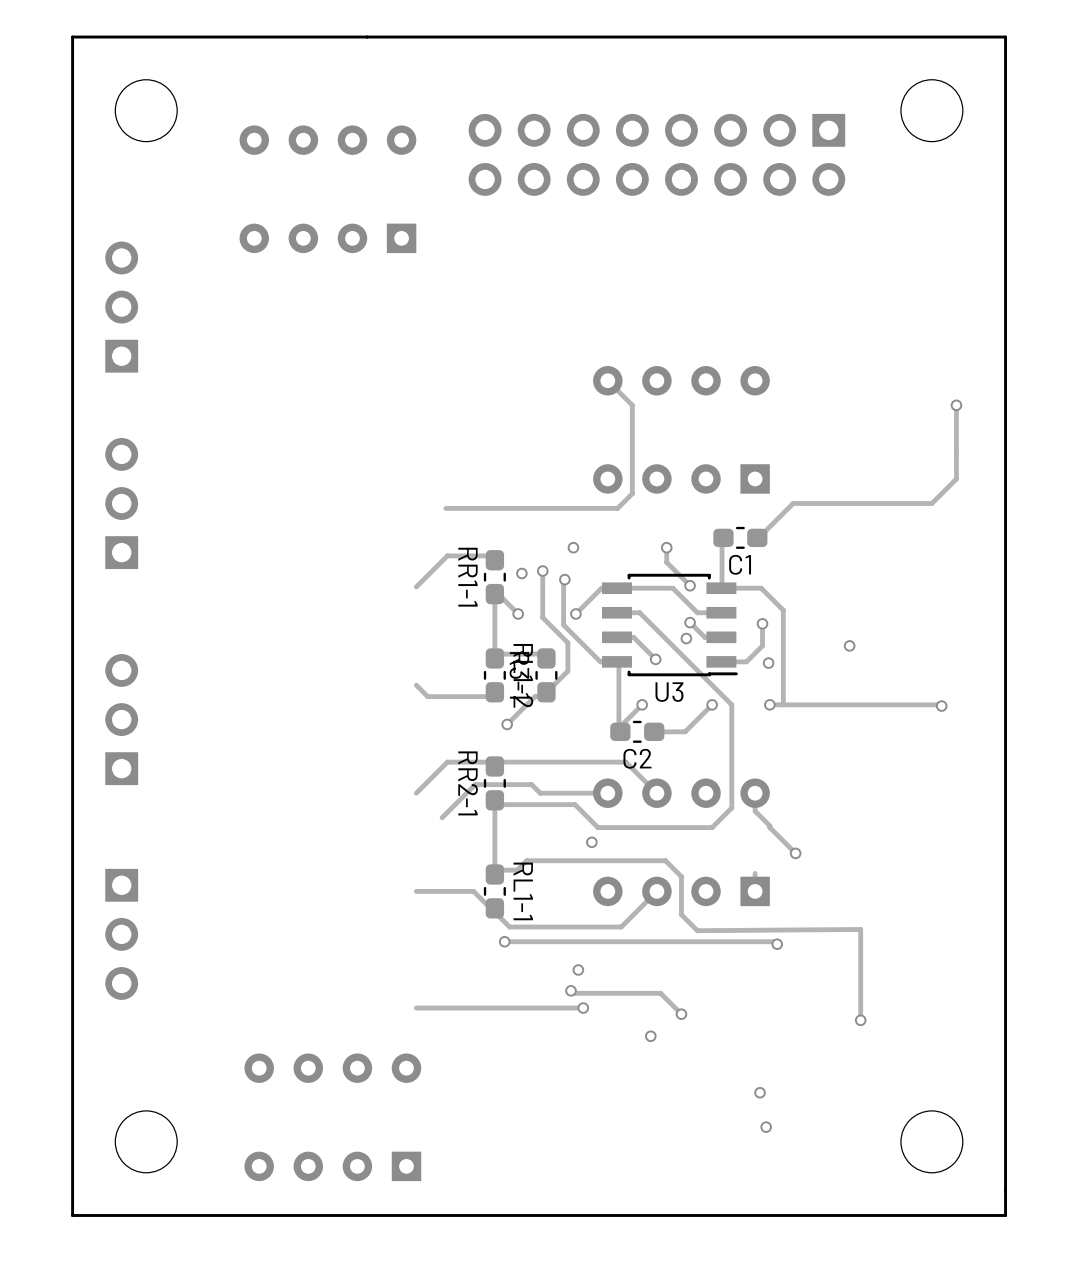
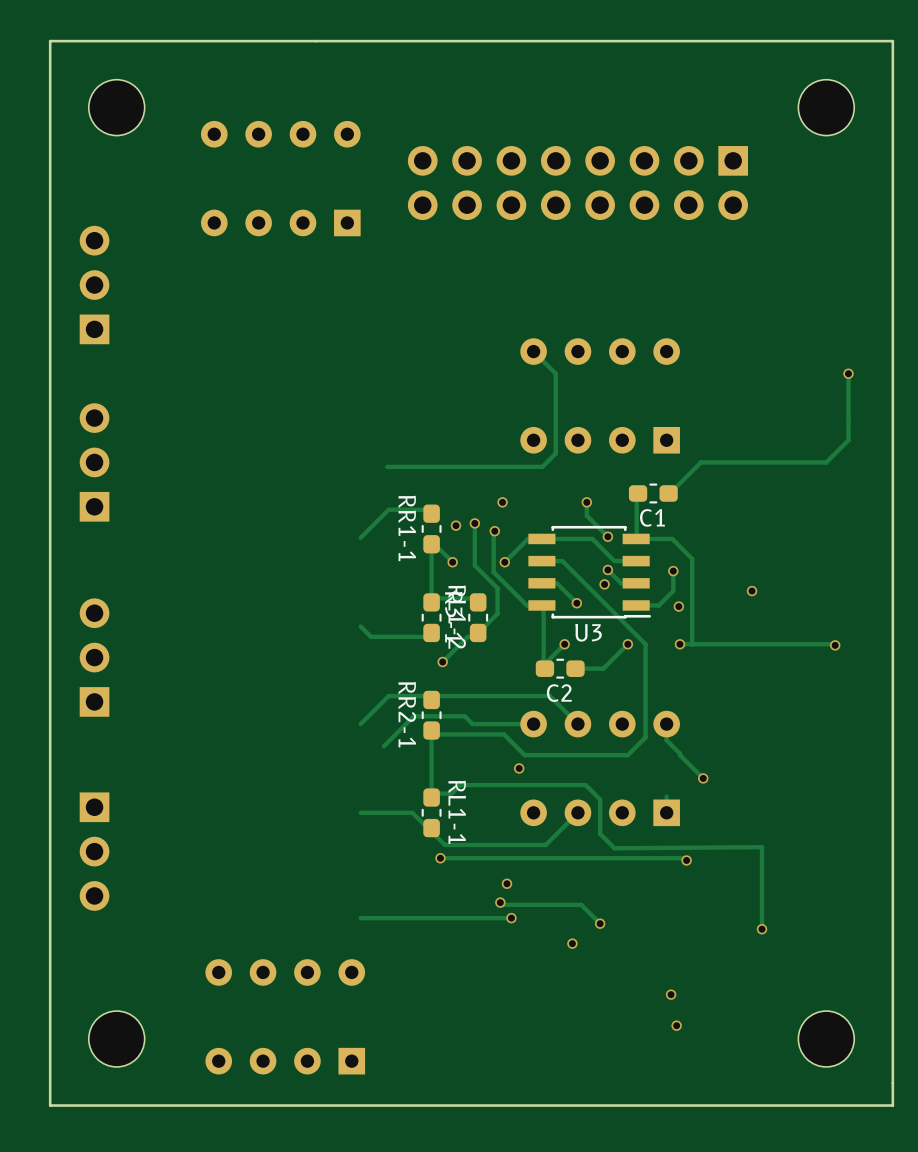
part position: (656, 154) -> (577, 183)

